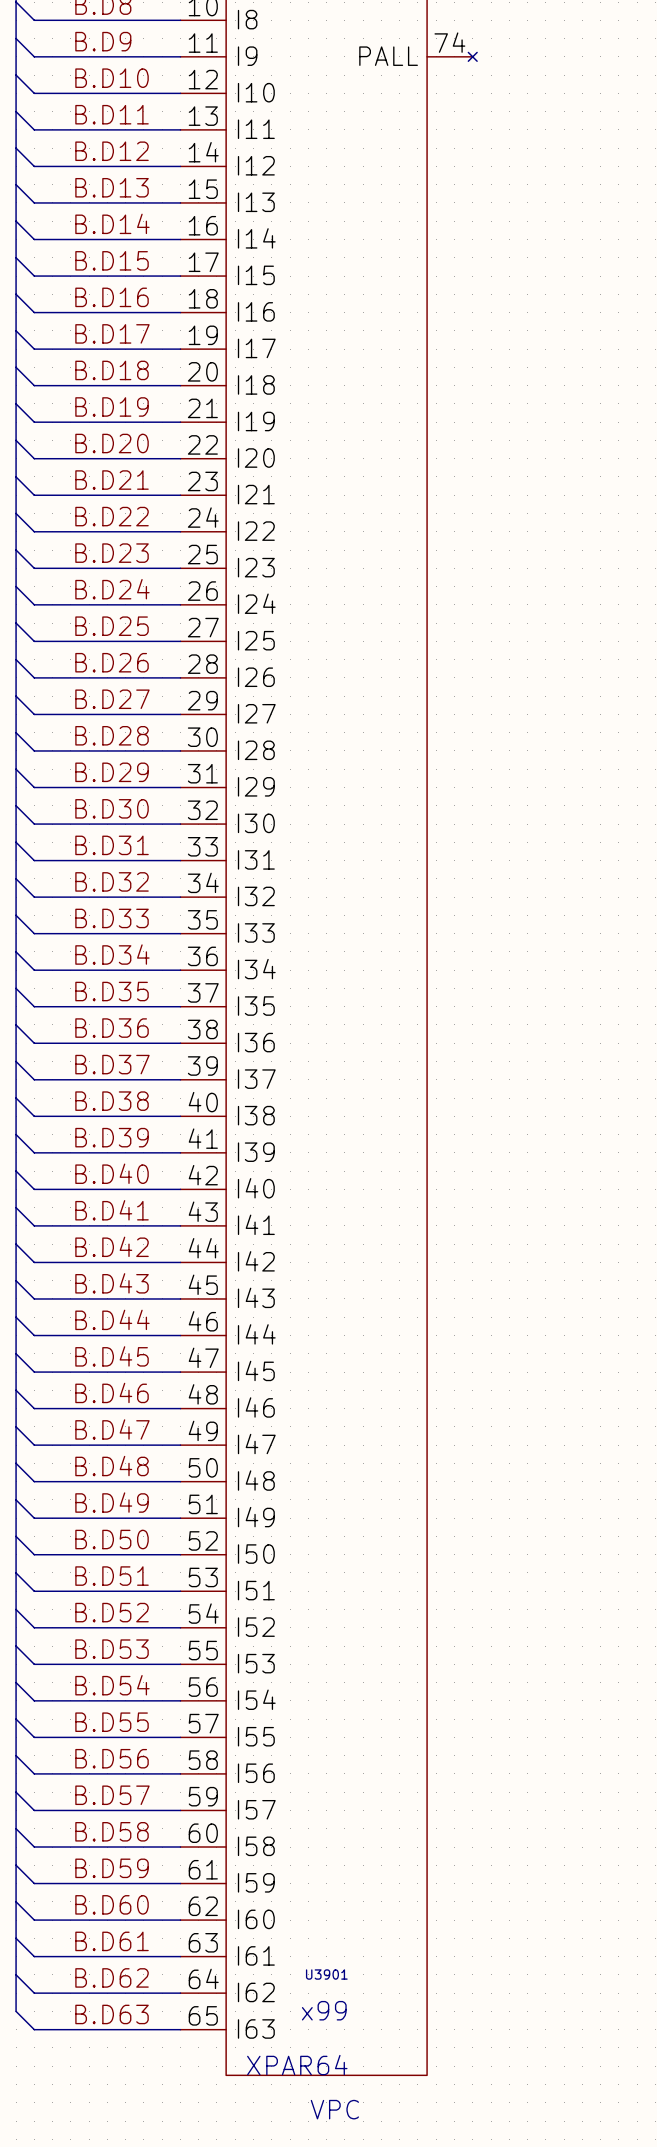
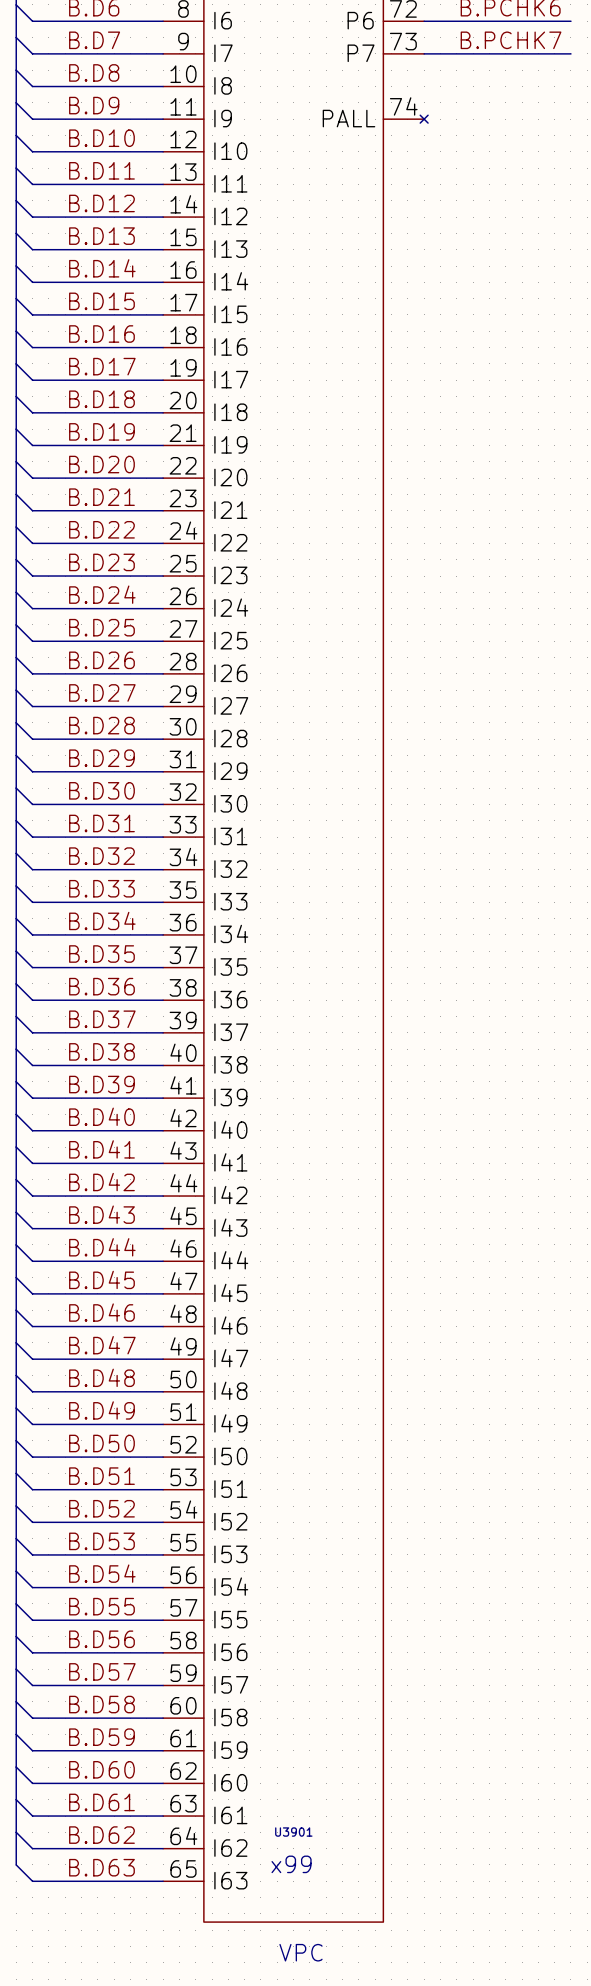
U3901 value: XPAR64 (297, 2065) -> none

